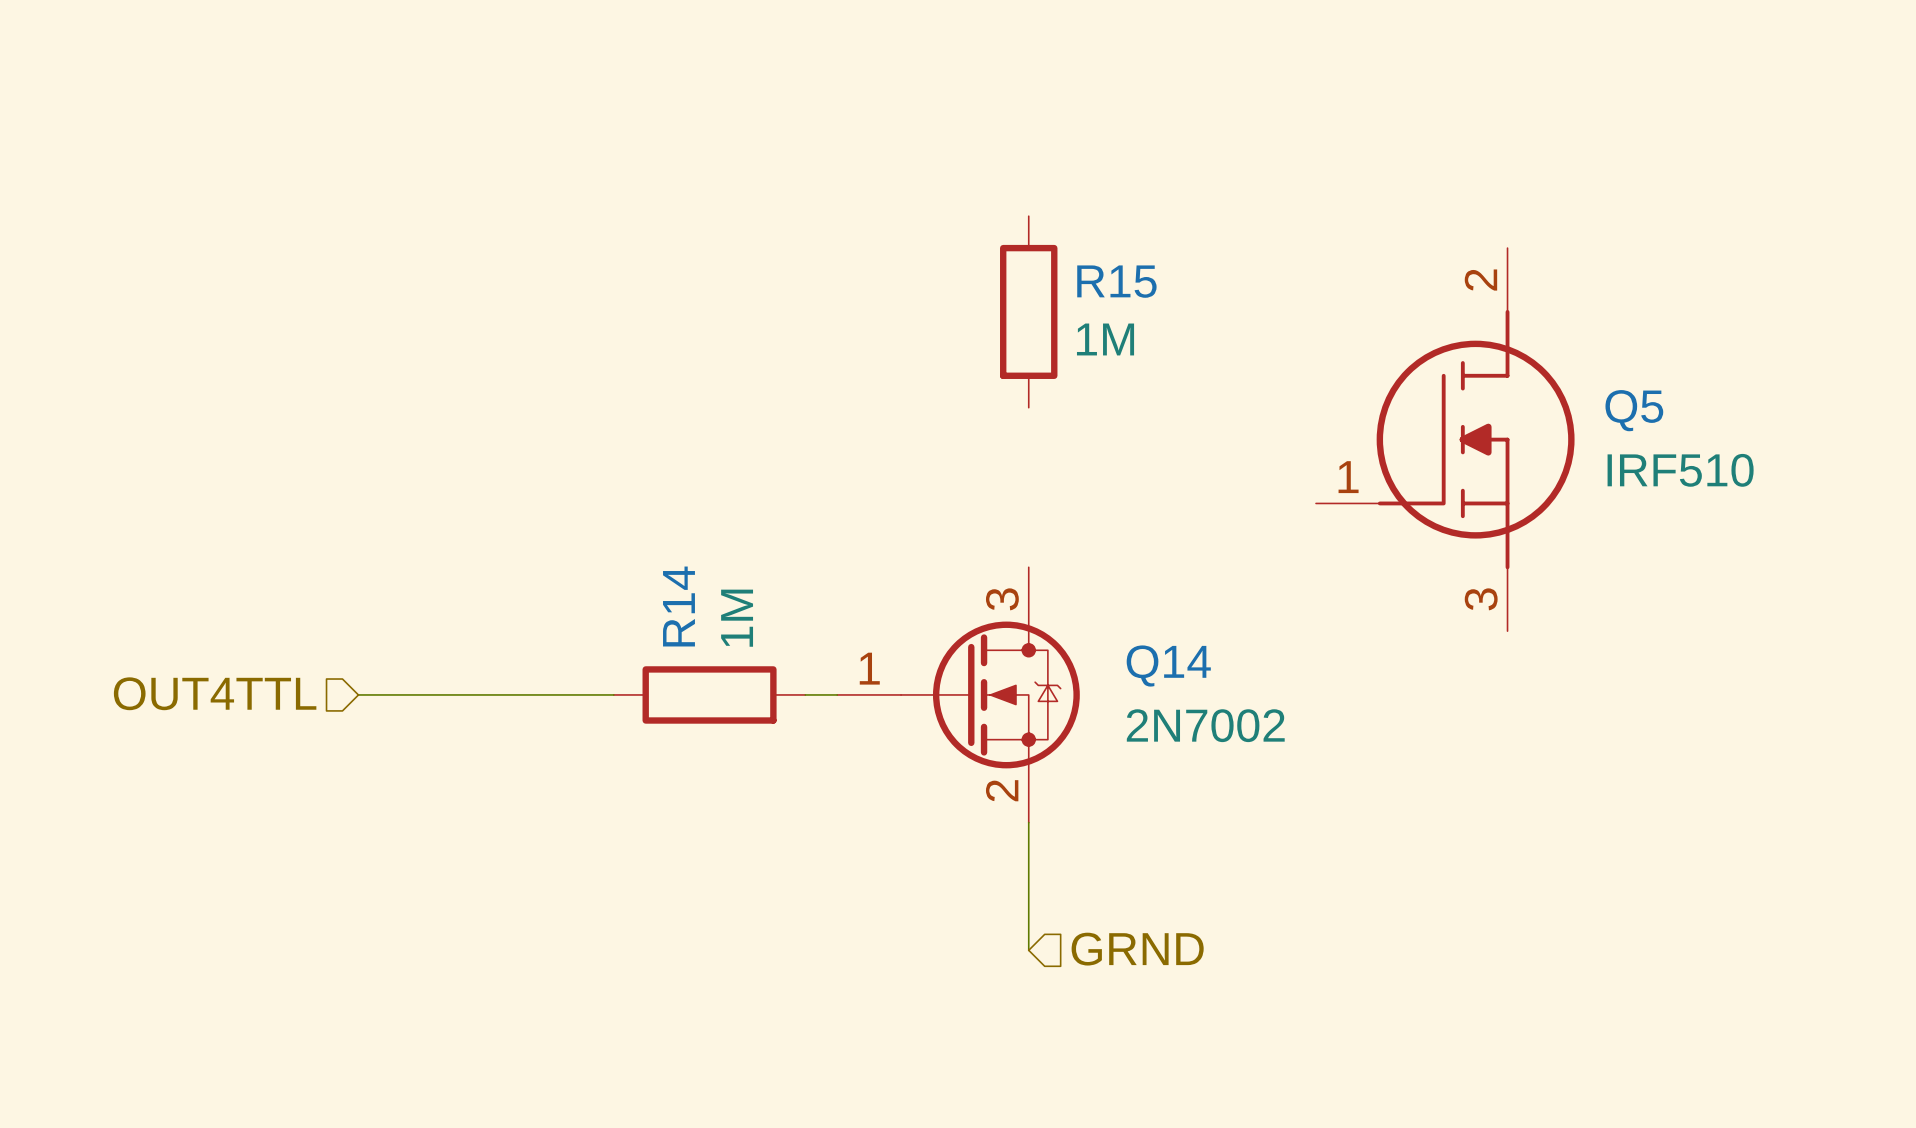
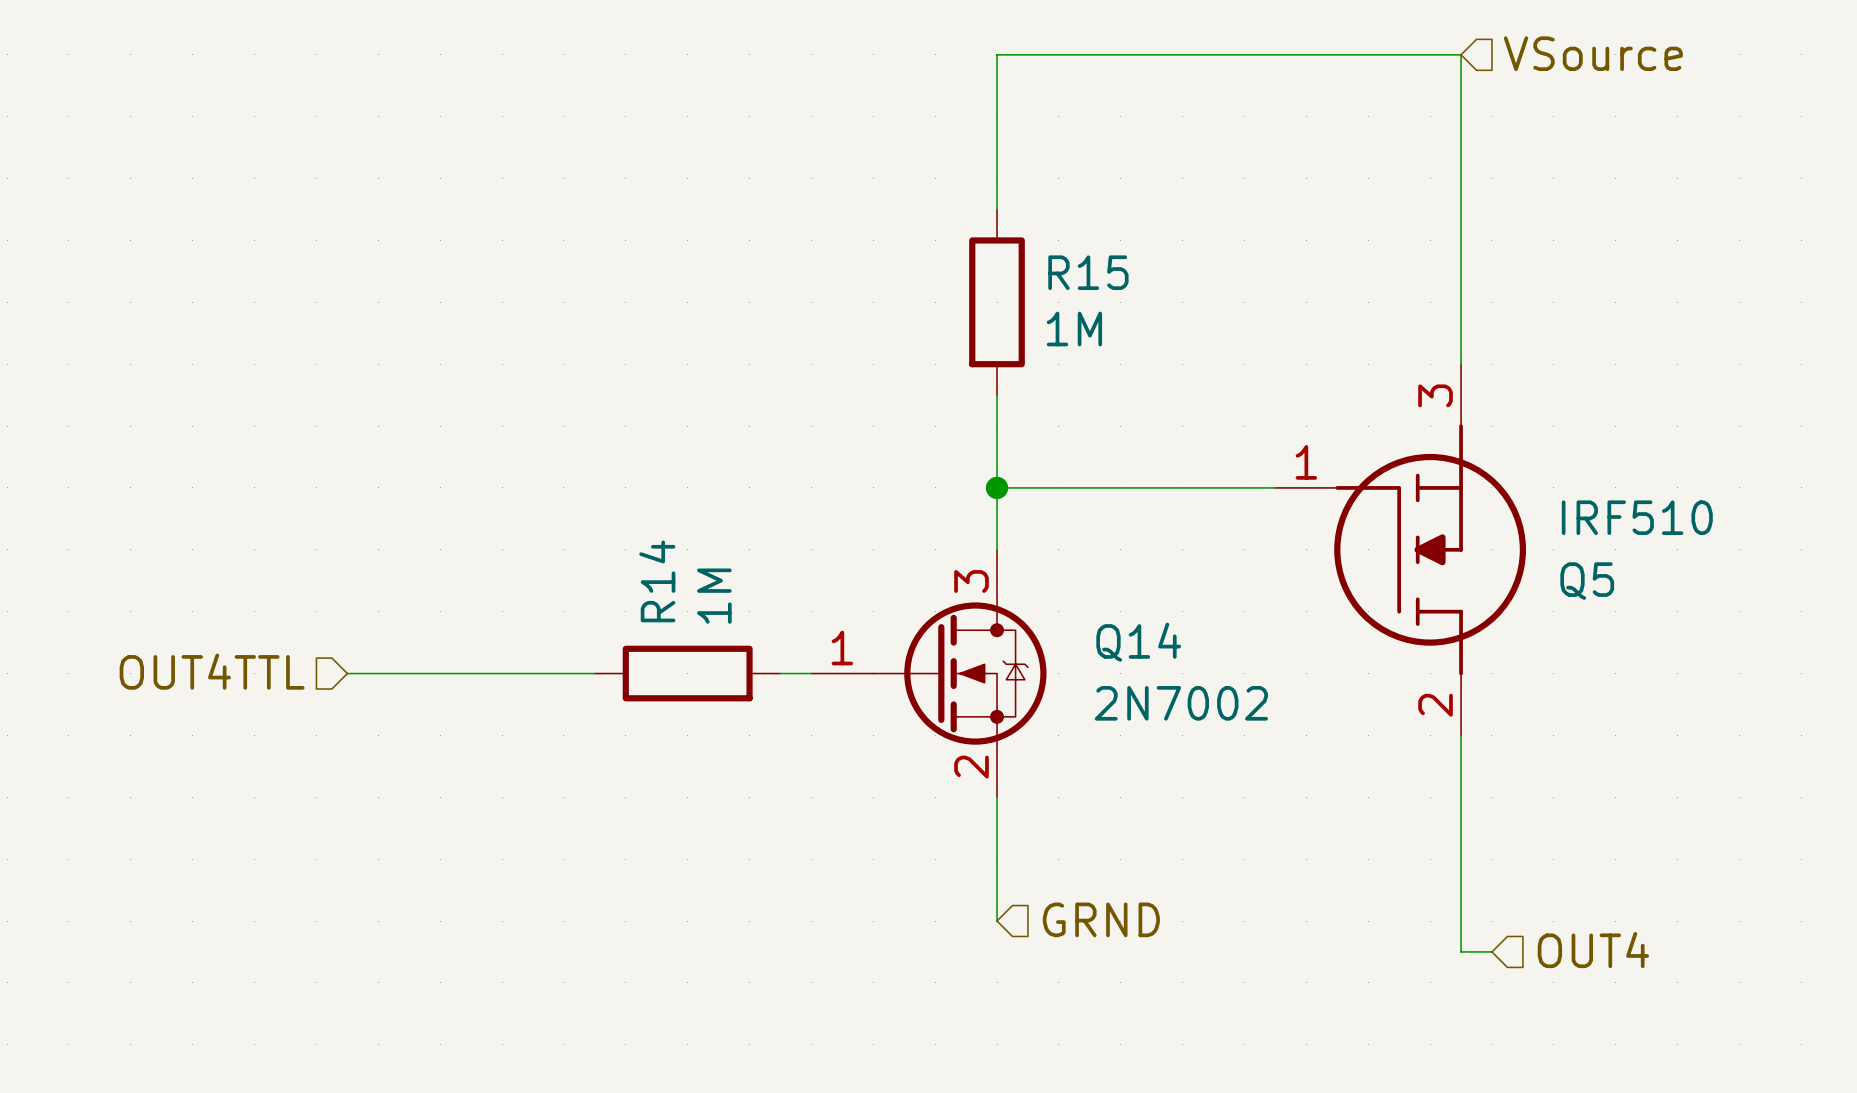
hierarchical label: none -> VSource (1593, 53)
wire: none -> (997, 209) (997, 54) (1461, 54) (1461, 364)
wire: none -> (997, 395) (997, 549)
Q5 flip: as is (1475, 439) -> up-down (1430, 549)
wire: none -> (997, 487) (1275, 487)
junction: none -> (997, 487)
wire: none -> (1461, 735) (1461, 951) (1491, 951)
hierarchical label: none -> OUT4 (1593, 950)

